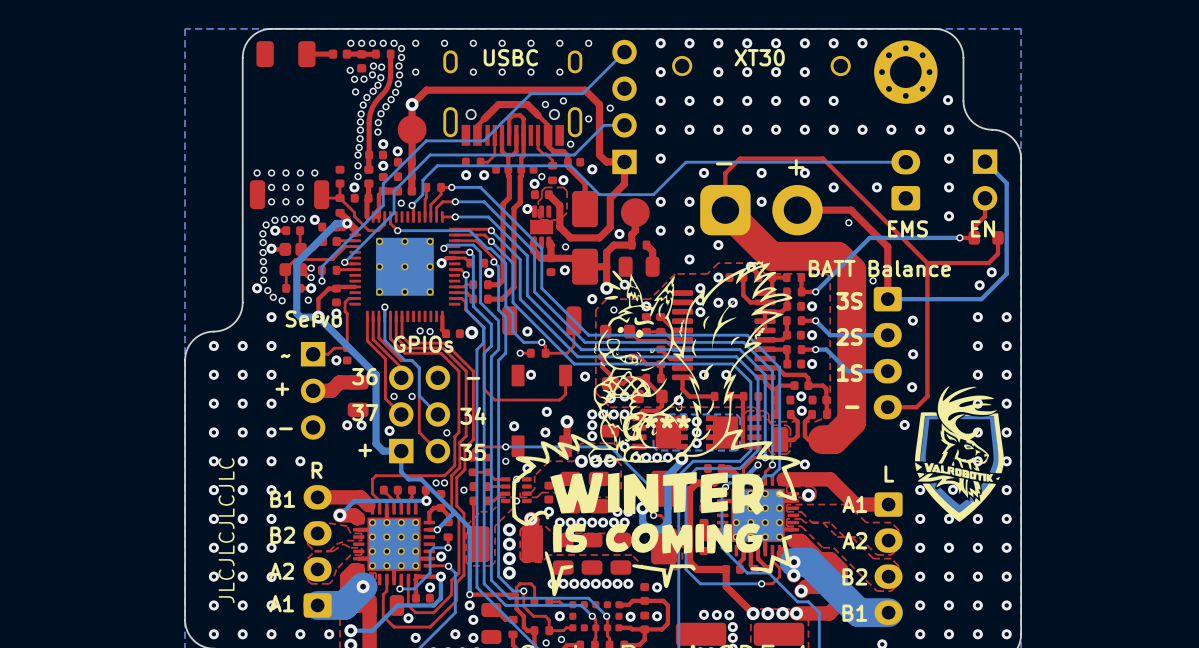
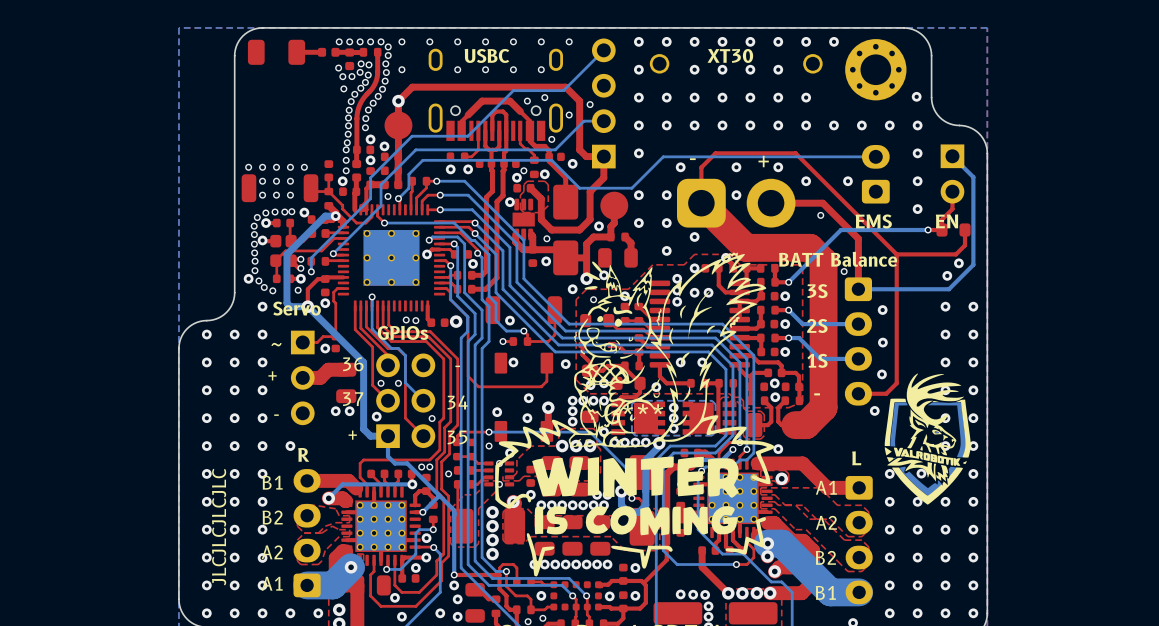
top track: (689, 562) (696, 569) (726, 569) -> (666, 543) (666, 560) (645, 580)
bottom track: (440, 576) (440, 598) (433, 605) (397, 605) (372, 630) (350, 630) -> none

